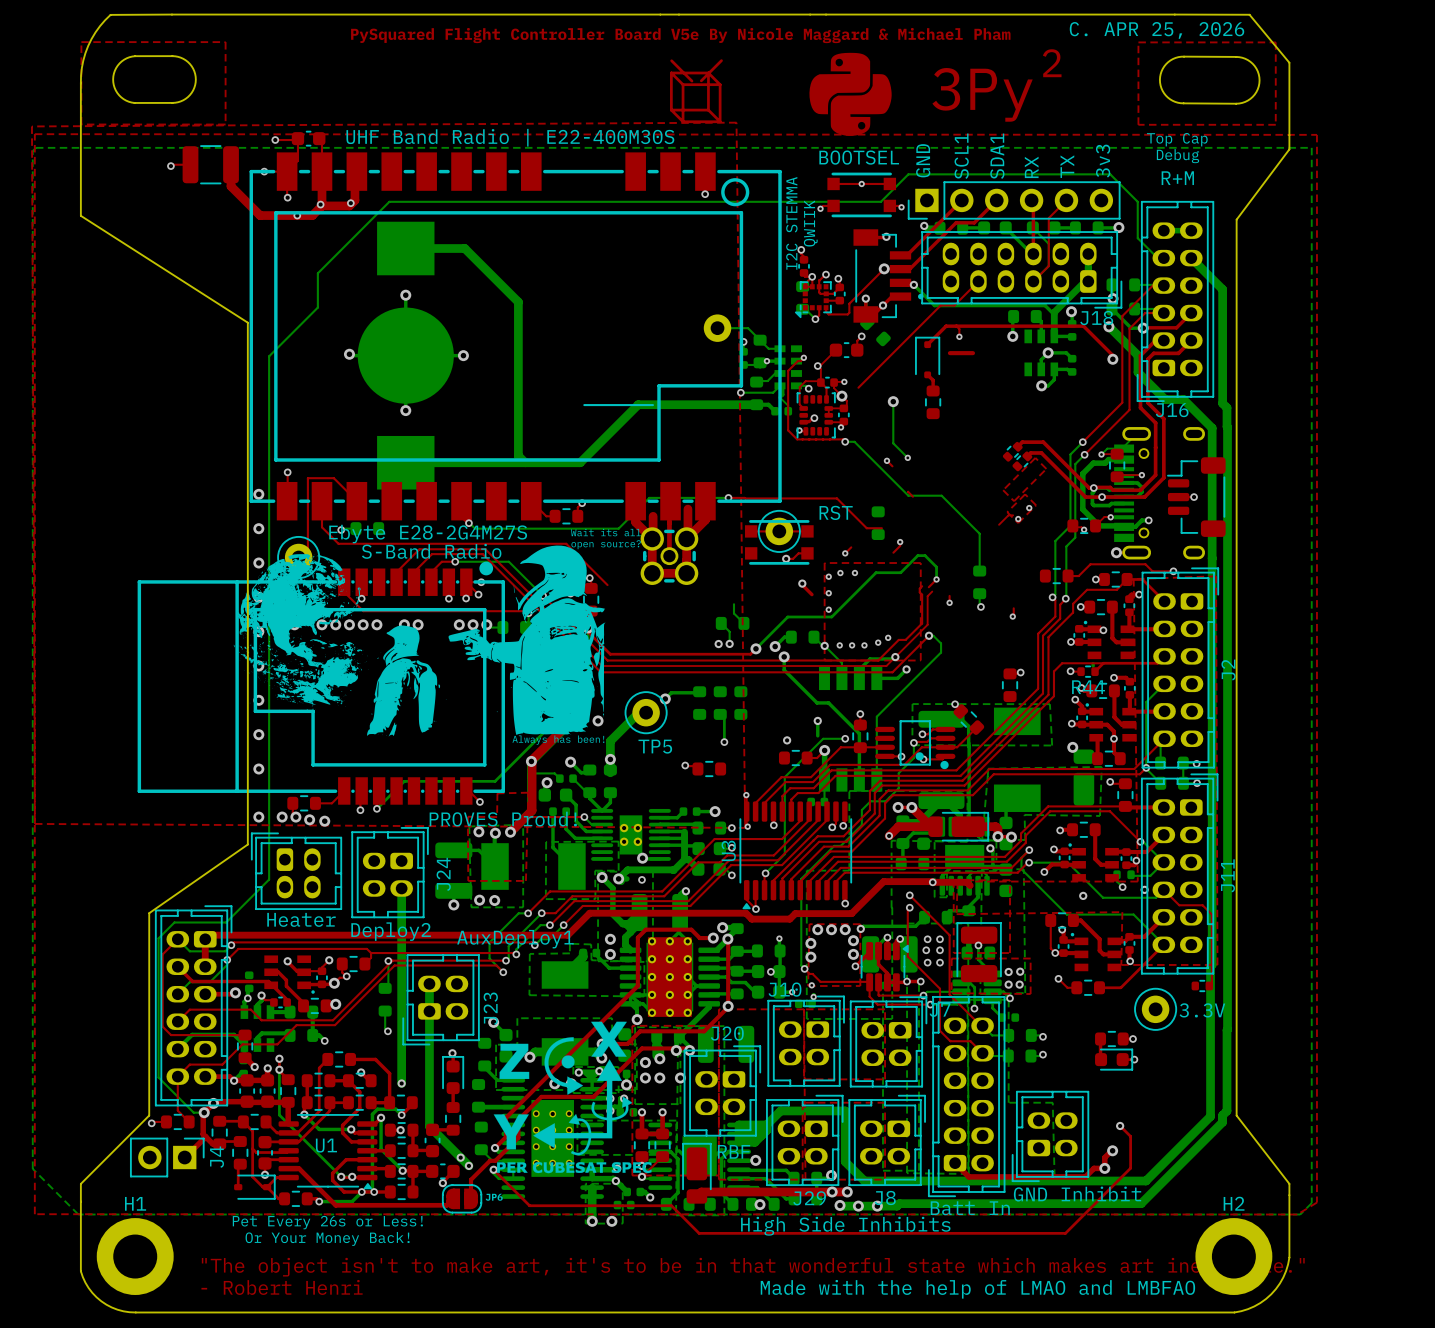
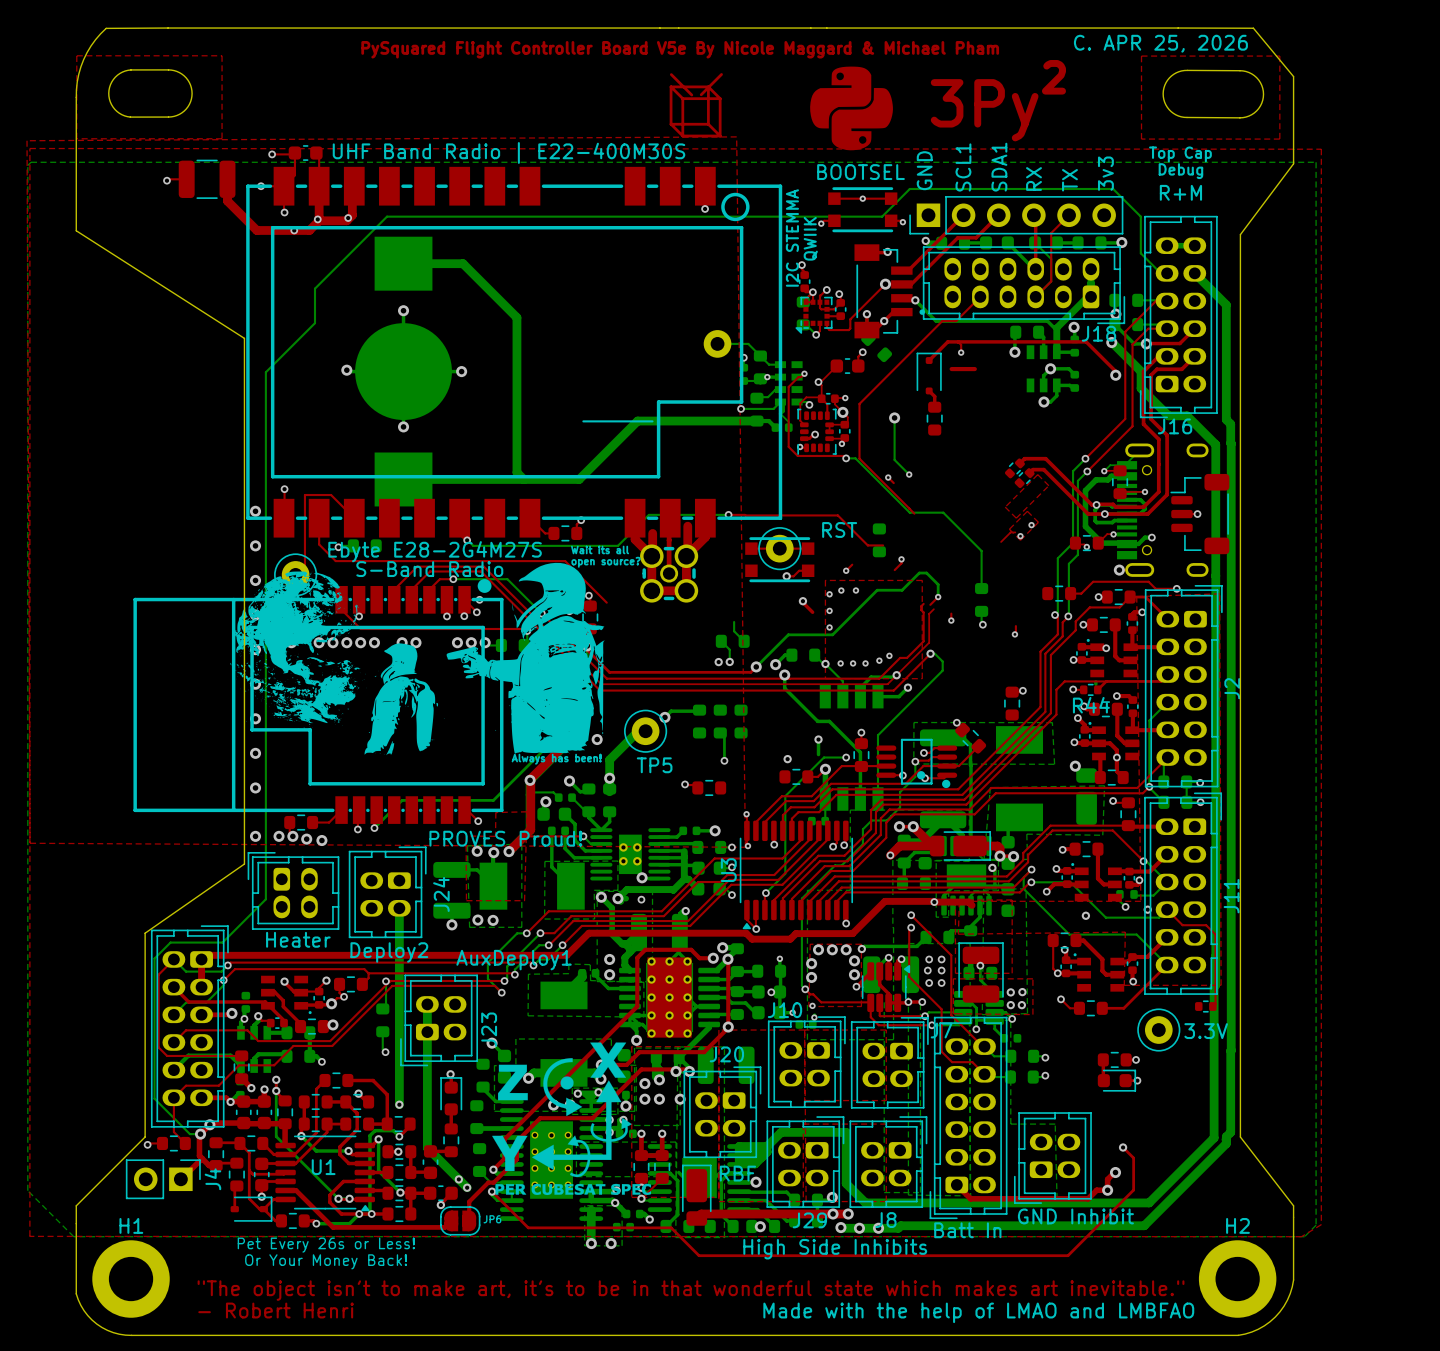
top track: none -> (859, 403) (859, 458) (909, 508)

